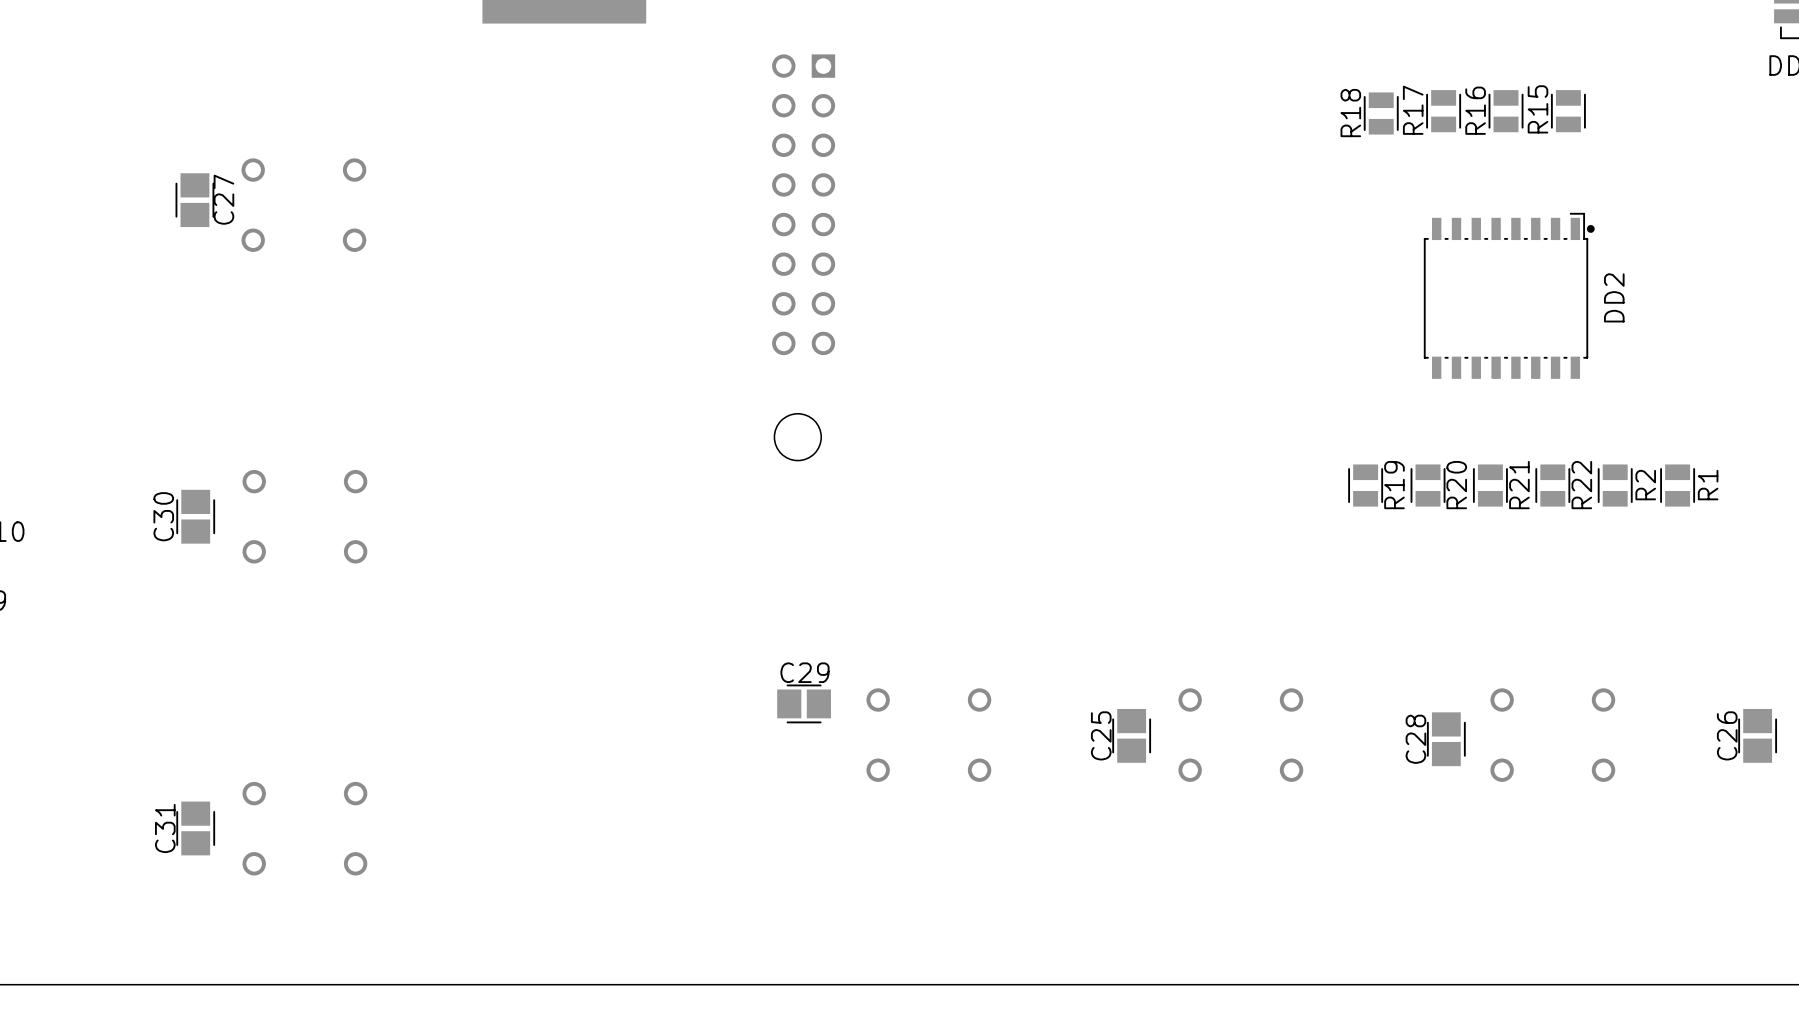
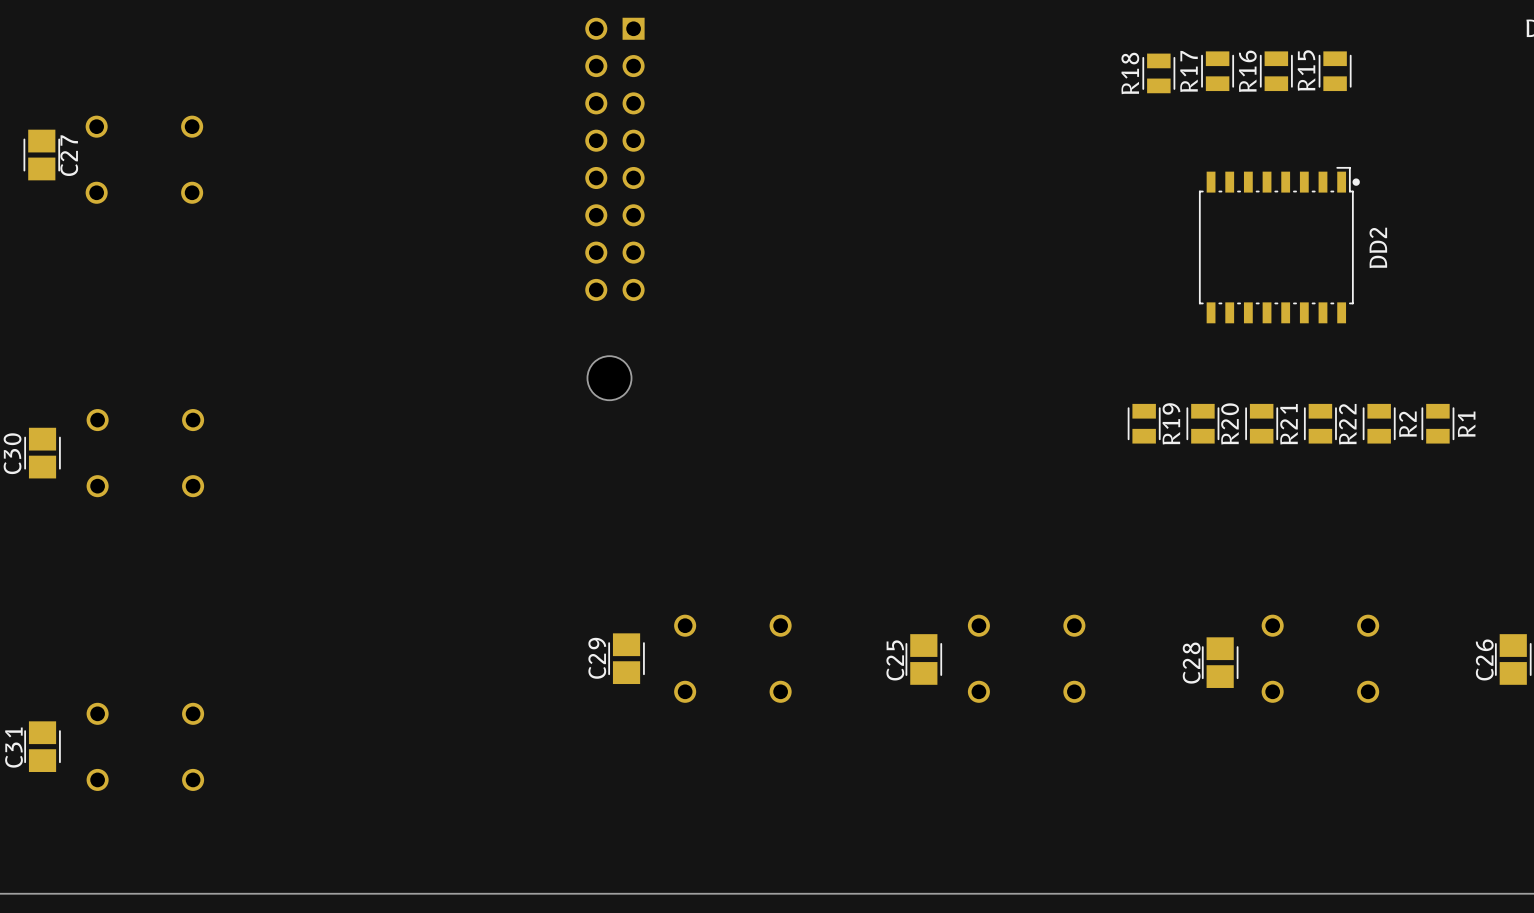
C29 name position: C29 (805, 672) -> C29 (597, 658)
C29 rotation: 0° (804, 703) -> 90° clockwise (626, 658)
C29 position: (804, 703) -> (626, 658)

